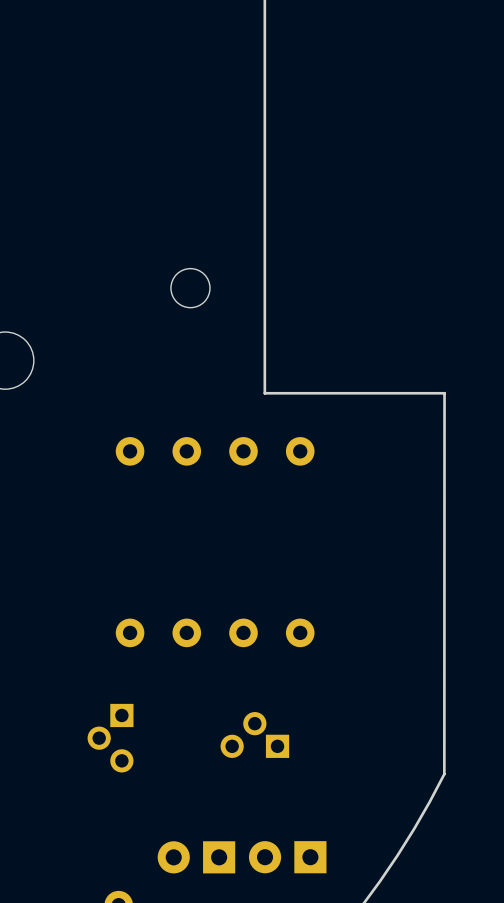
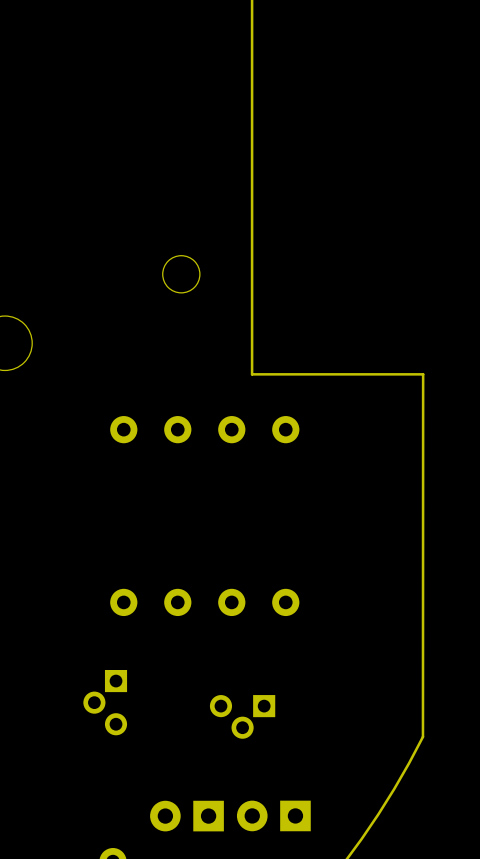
part: (254, 734) -> none
part: none -> (242, 716)

